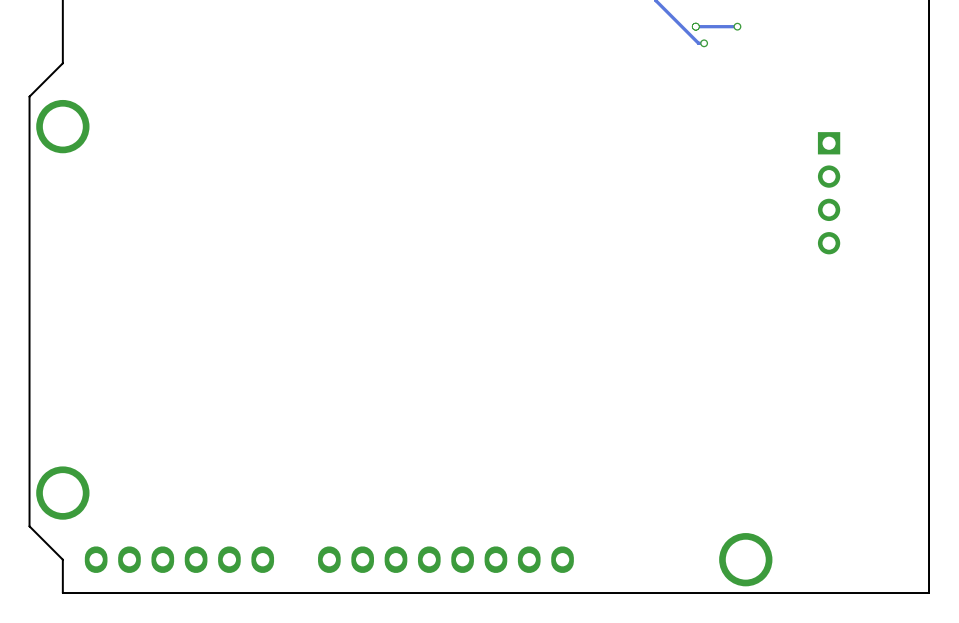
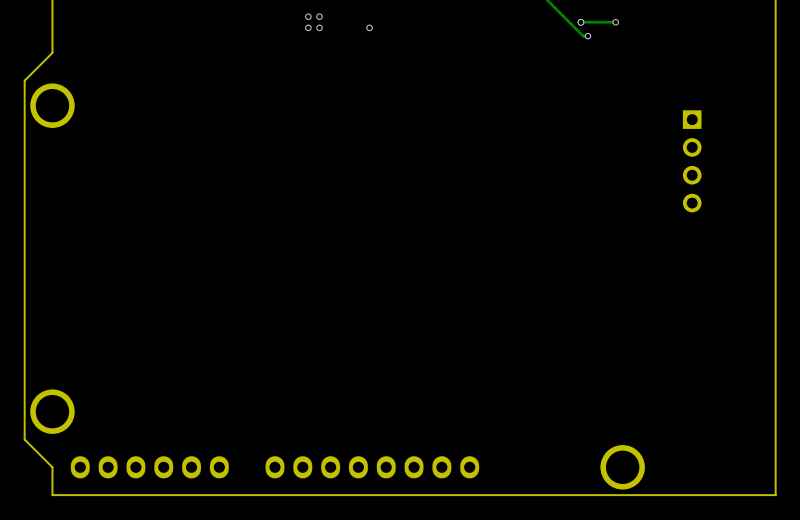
via: none -> (308, 16)
via: none -> (319, 16)
via: none -> (308, 27)
via: none -> (319, 27)
via: none -> (369, 27)

